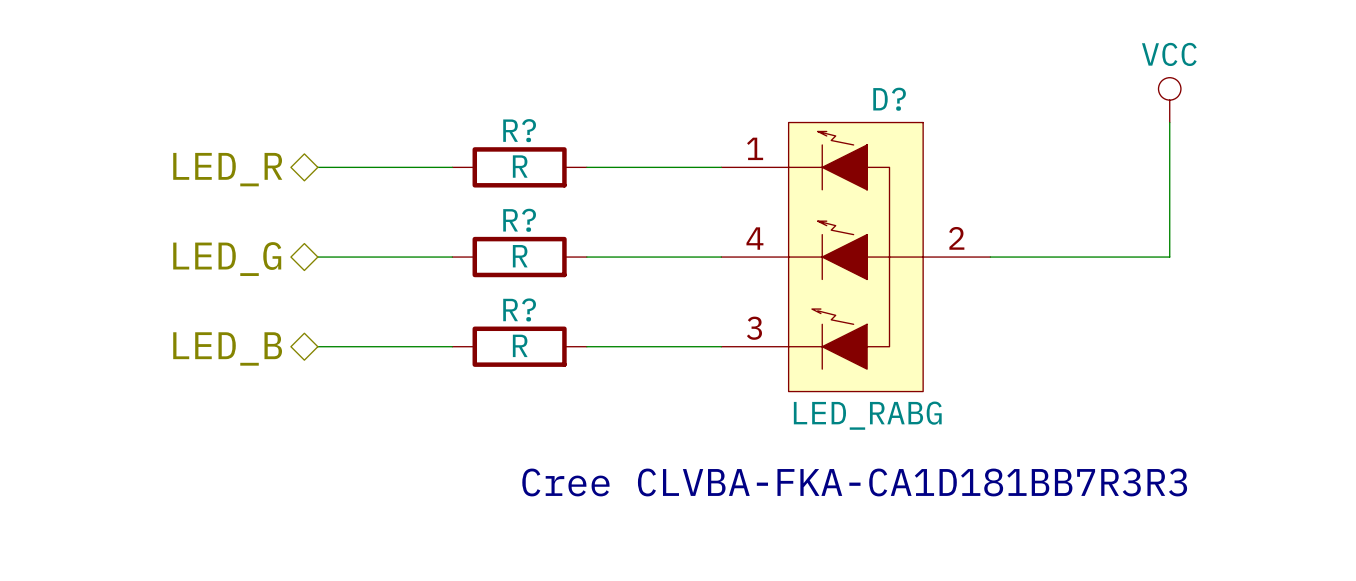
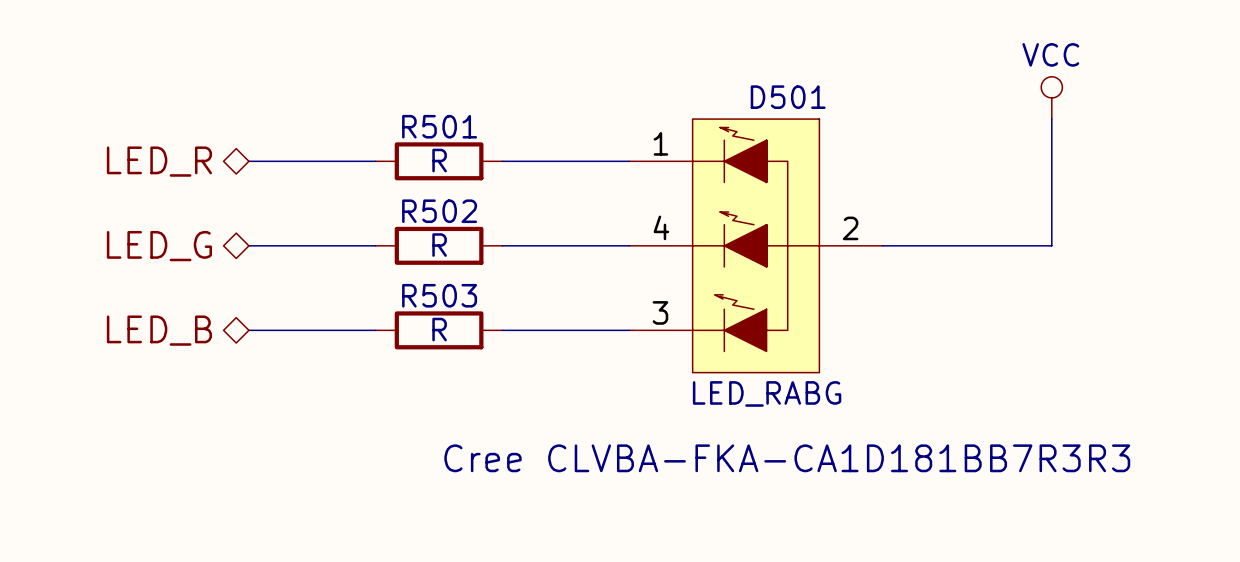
D? name: D? (889, 99) -> D501 (788, 97)
R? name: R? (519, 130) -> R501 (439, 126)
R? name: R? (519, 220) -> R502 (439, 211)
R? name: R? (519, 309) -> R503 (439, 295)

